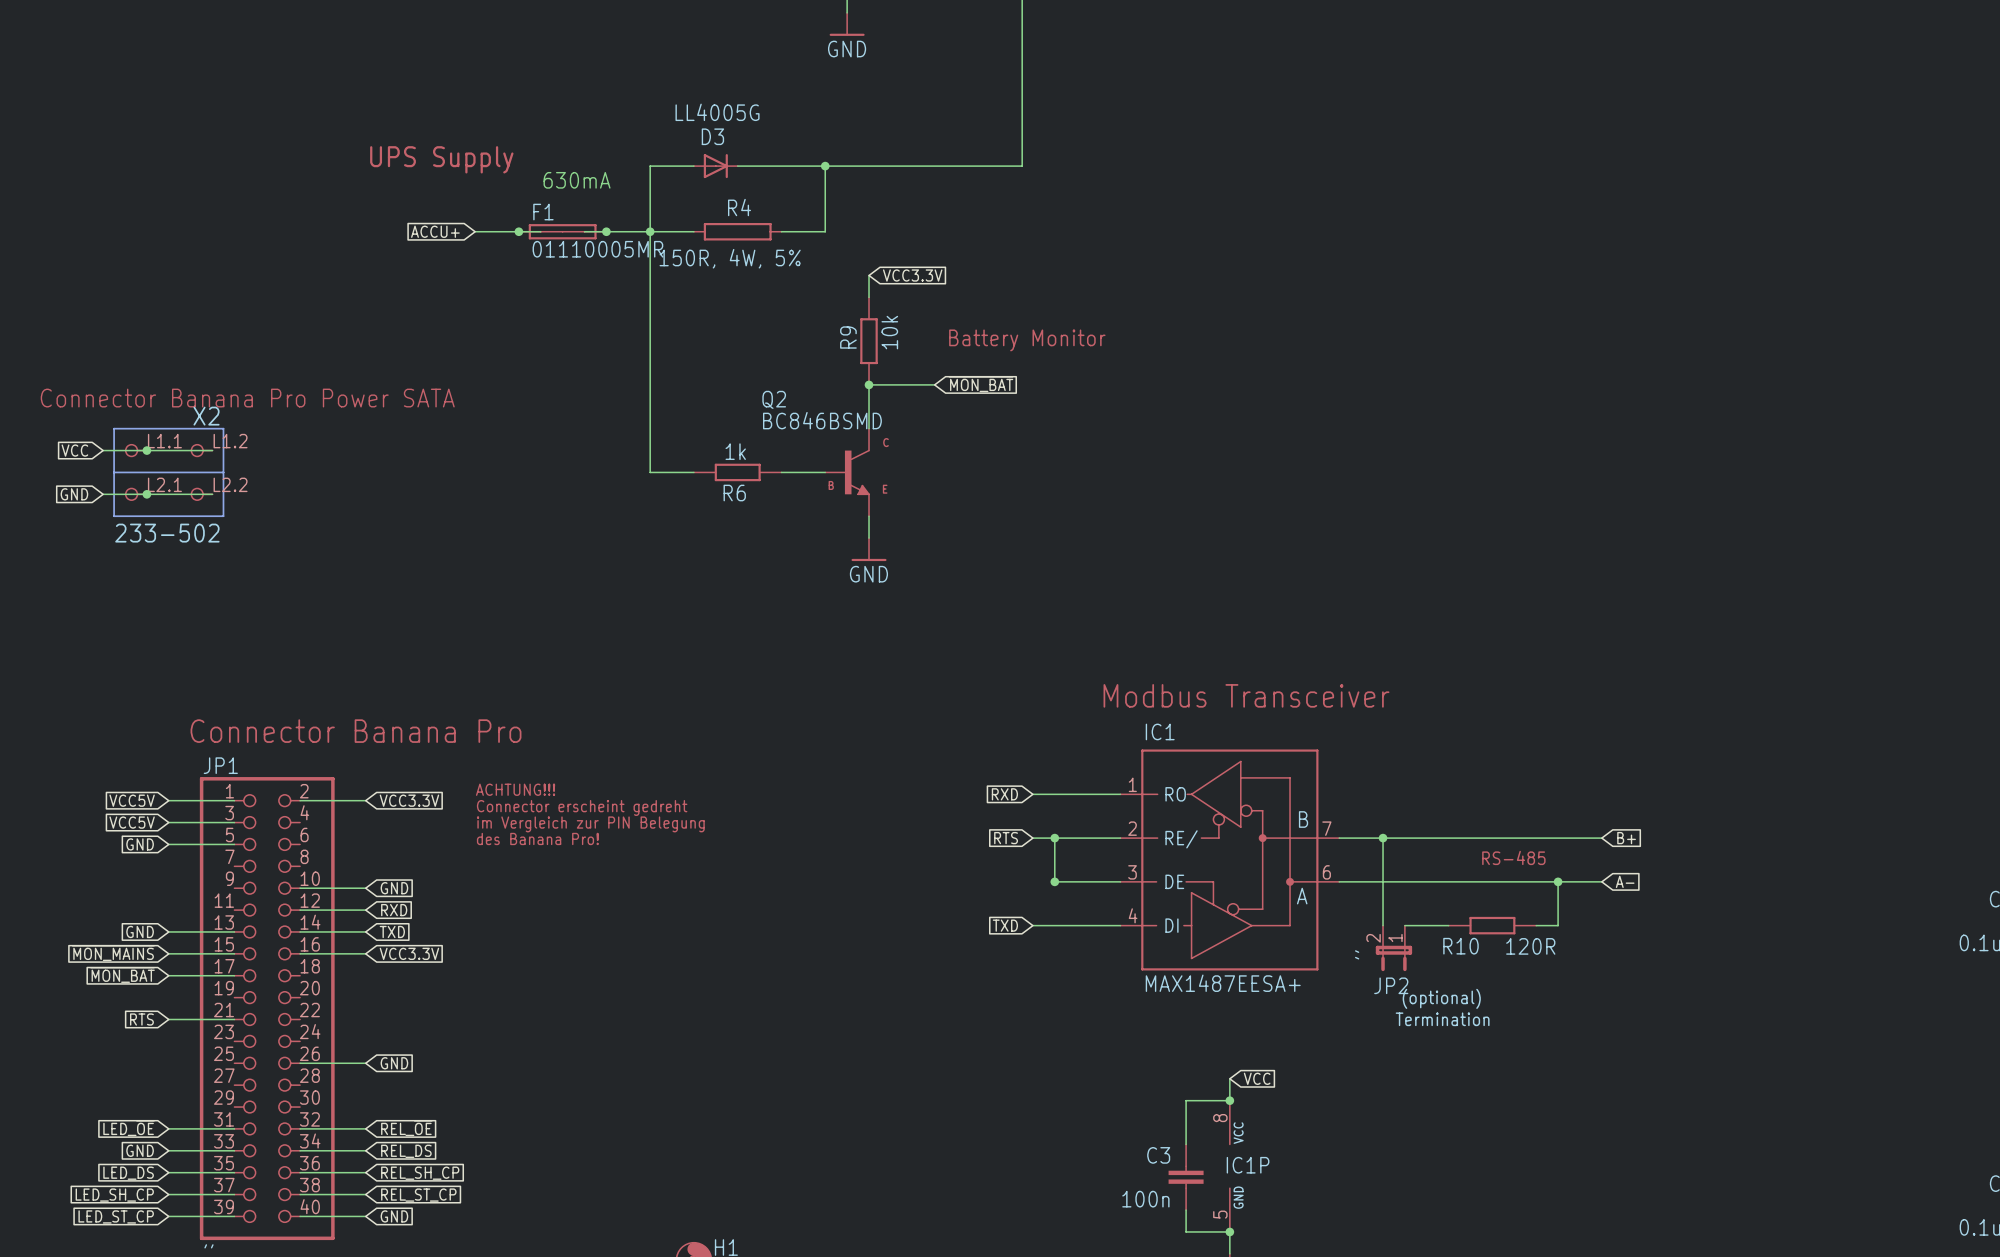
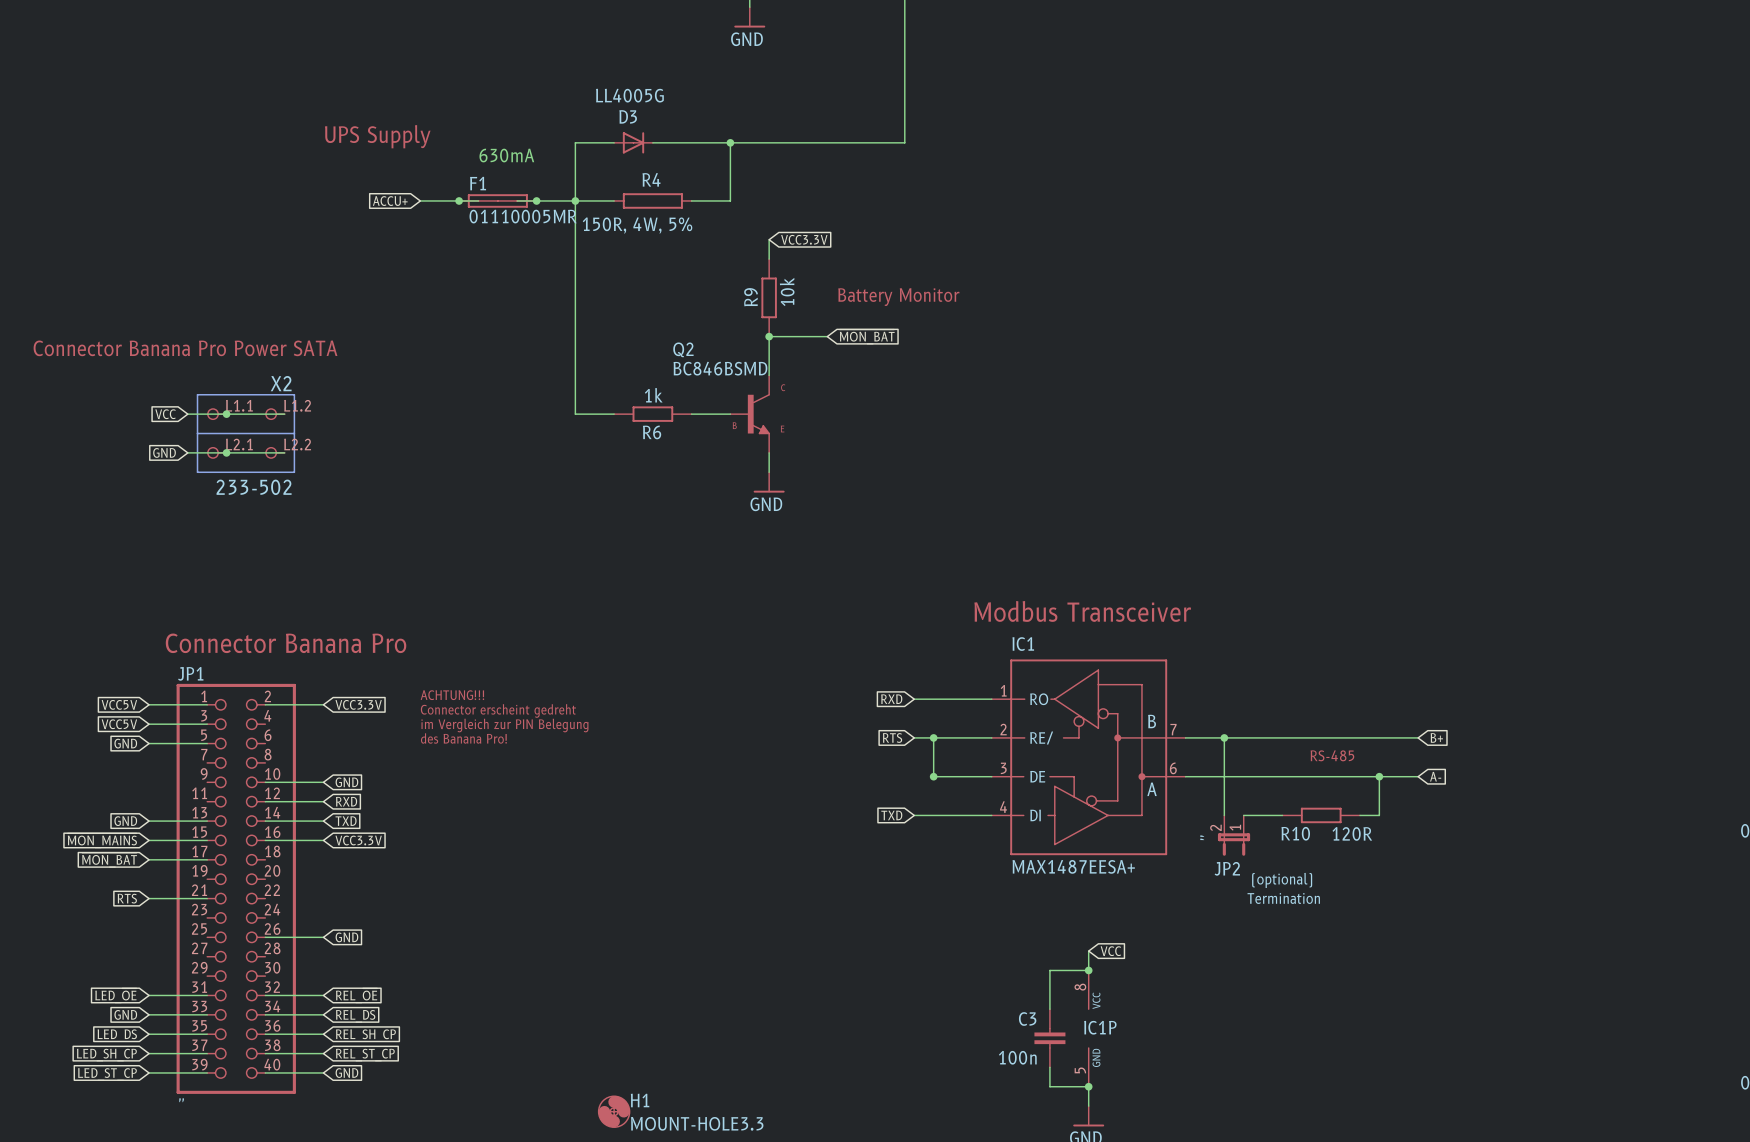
global label position: VCC (74, 450) -> VCC (165, 414)
wire: (103, 450) (212, 450) -> (187, 414) (284, 414)
junction: (146, 450) -> none
X2 position: (168, 472) -> (245, 433)
junction: none -> (226, 414)
global label position: GND (74, 494) -> GND (164, 452)
wire: (103, 494) (212, 494) -> (187, 452) (284, 452)
junction: (146, 494) -> none
junction: none -> (226, 452)

